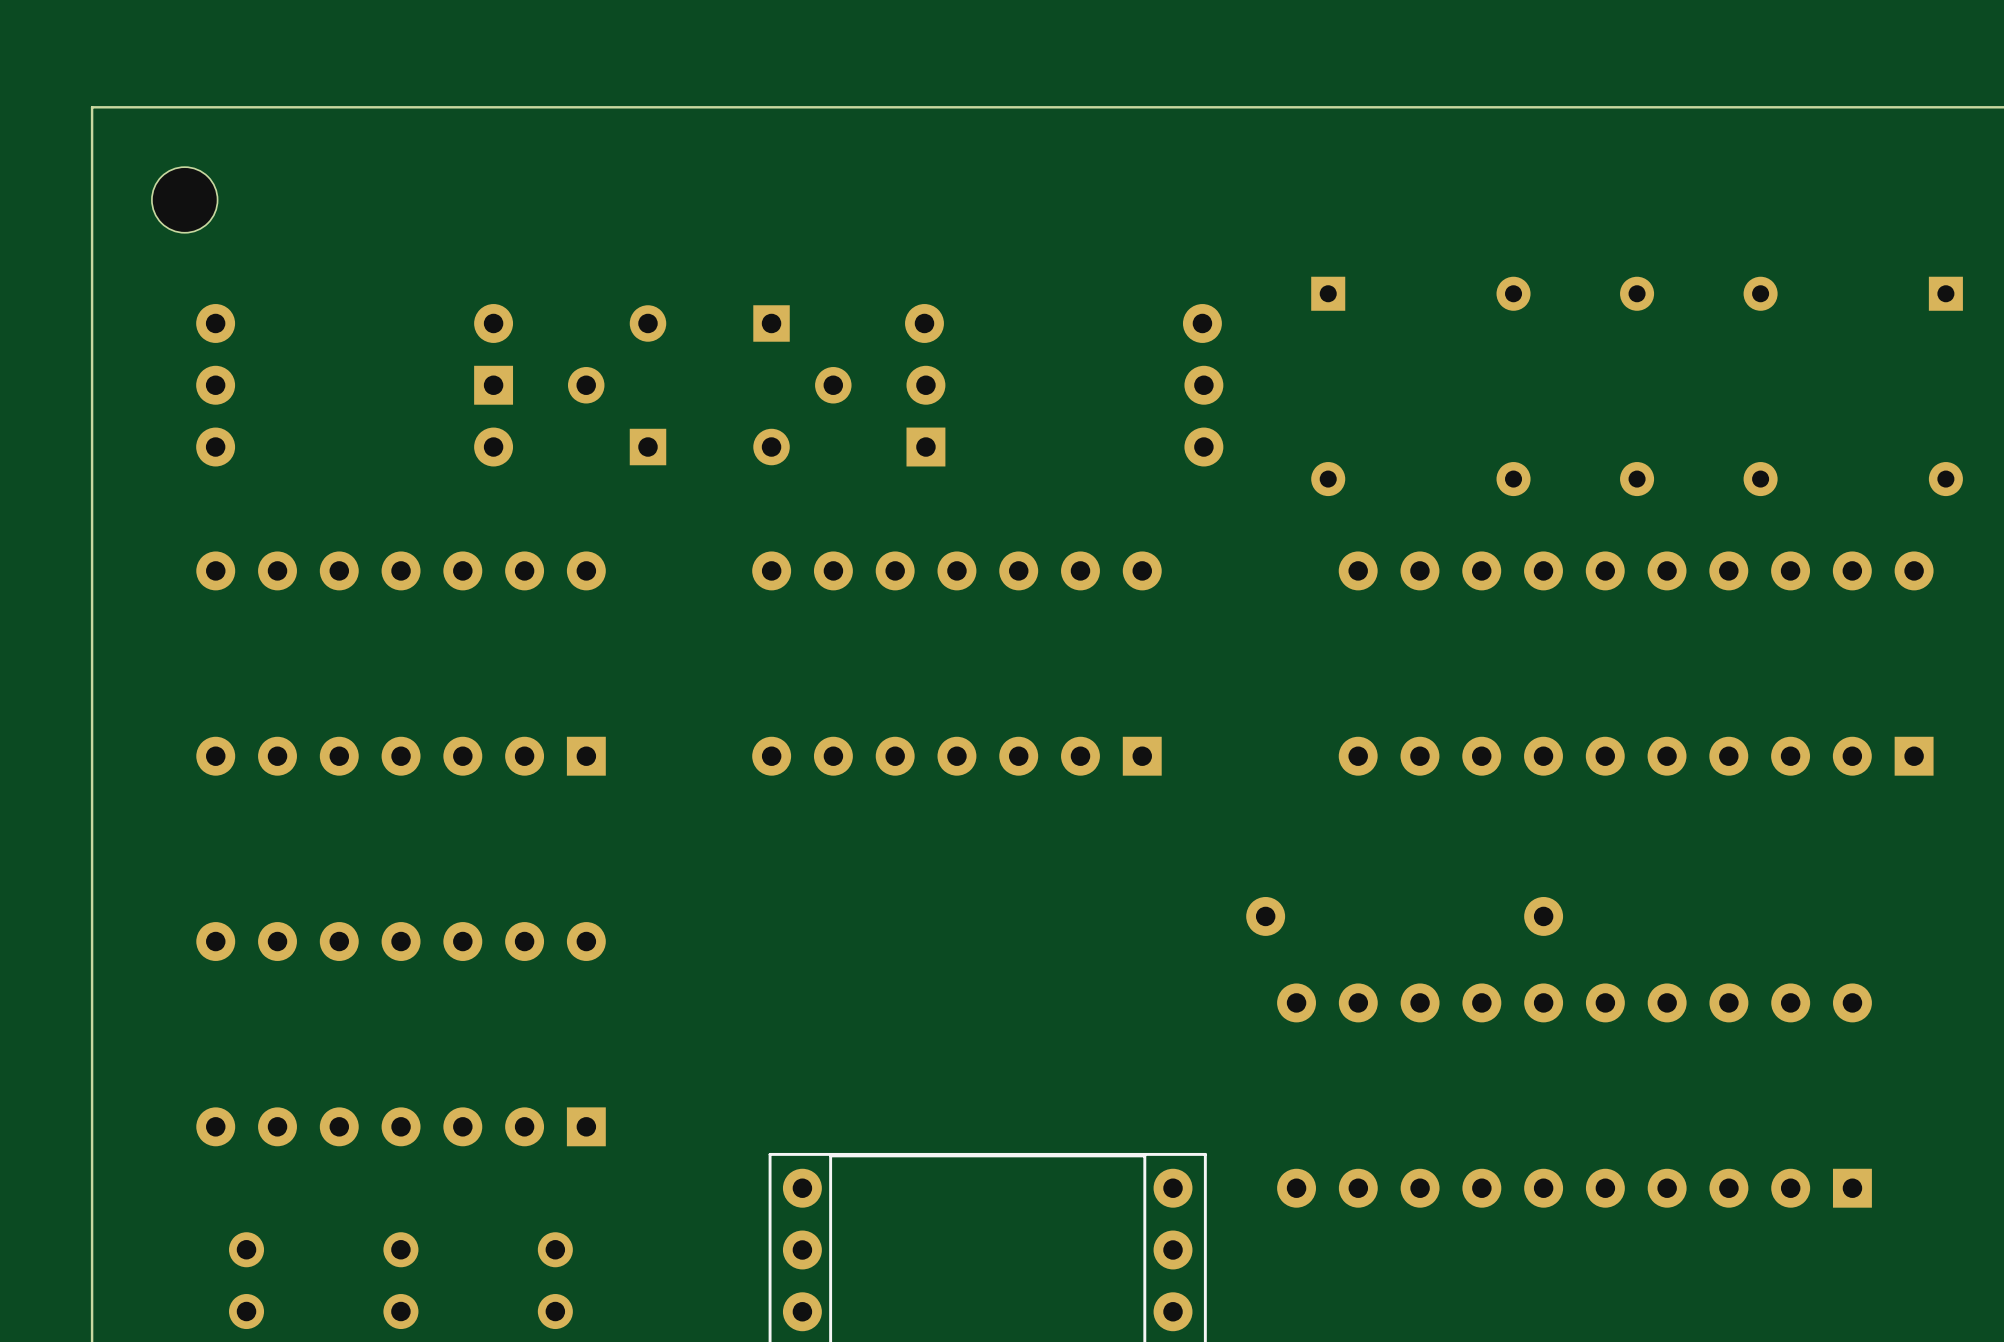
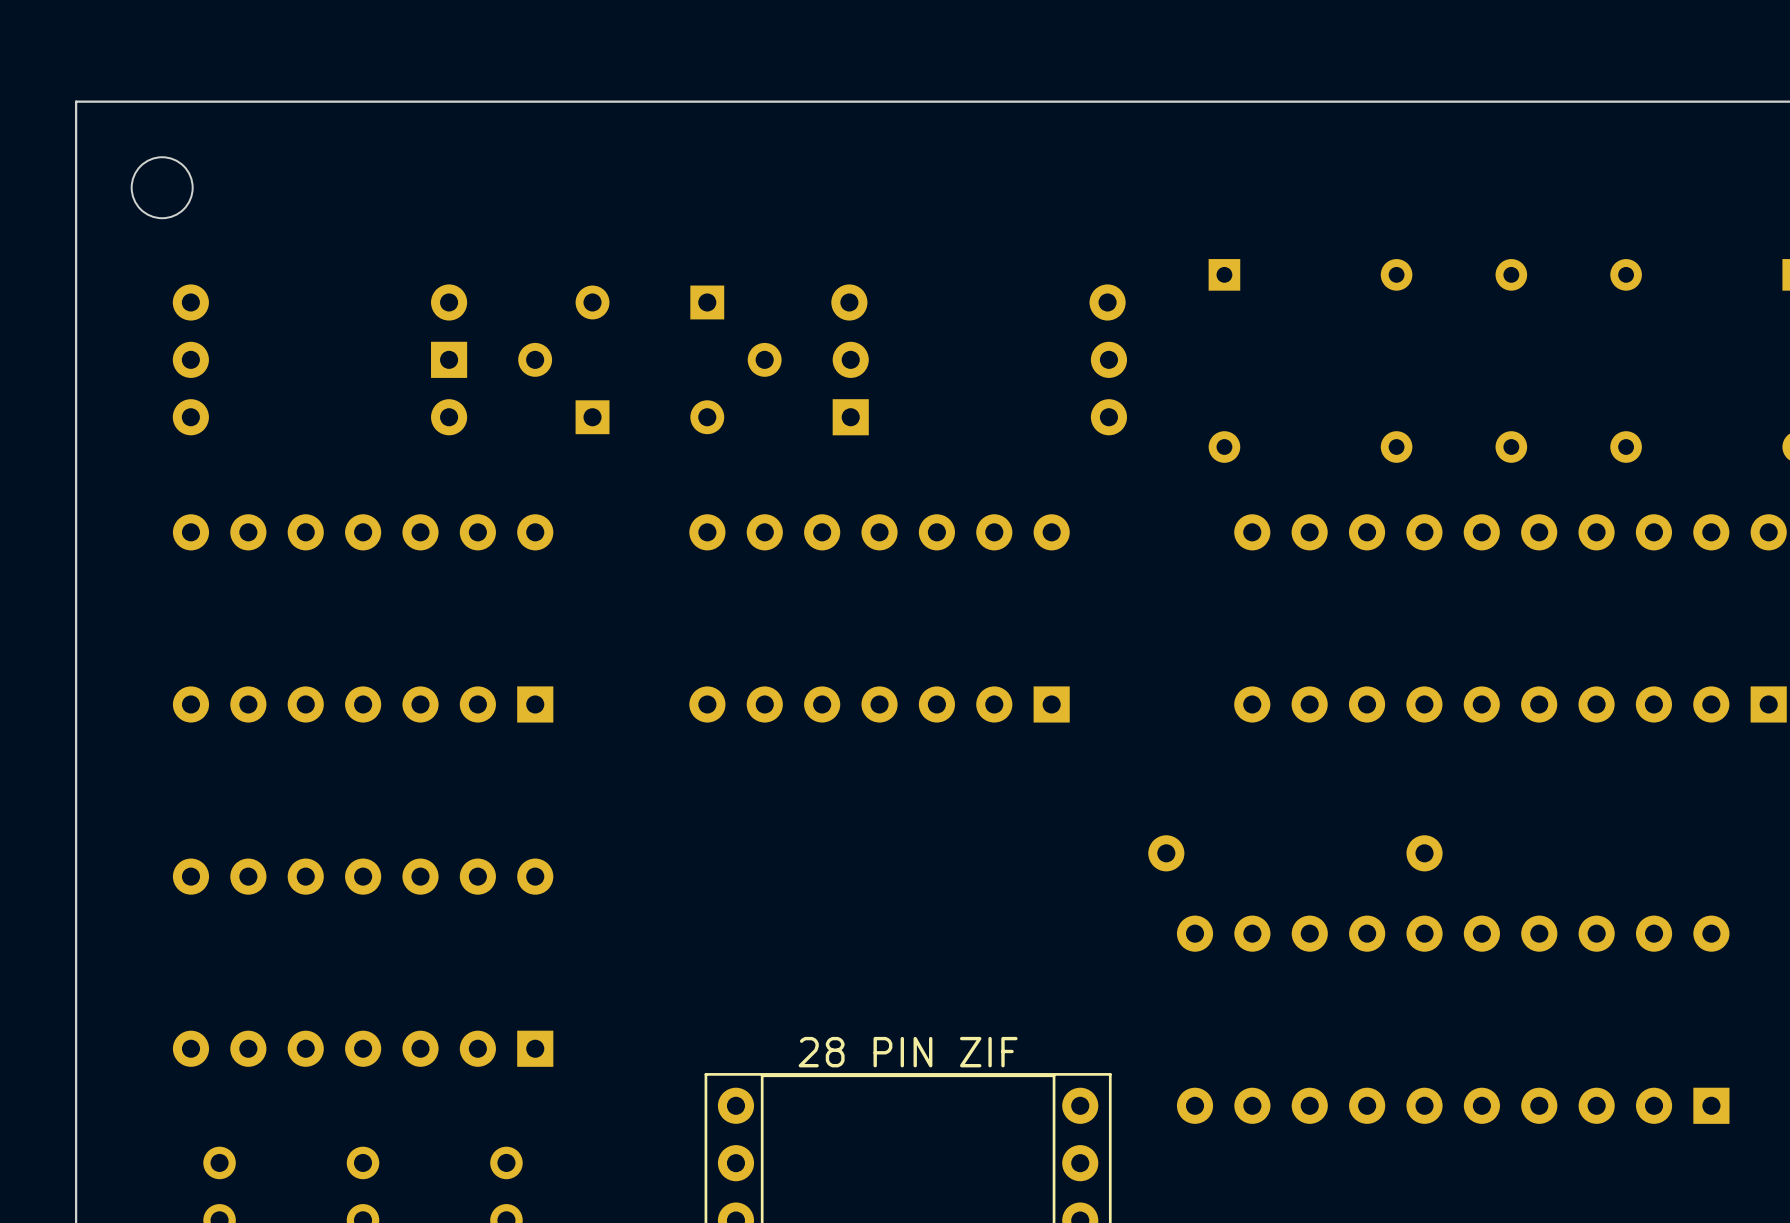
part value: none -> 28 PIN ZIF (908, 1052)

